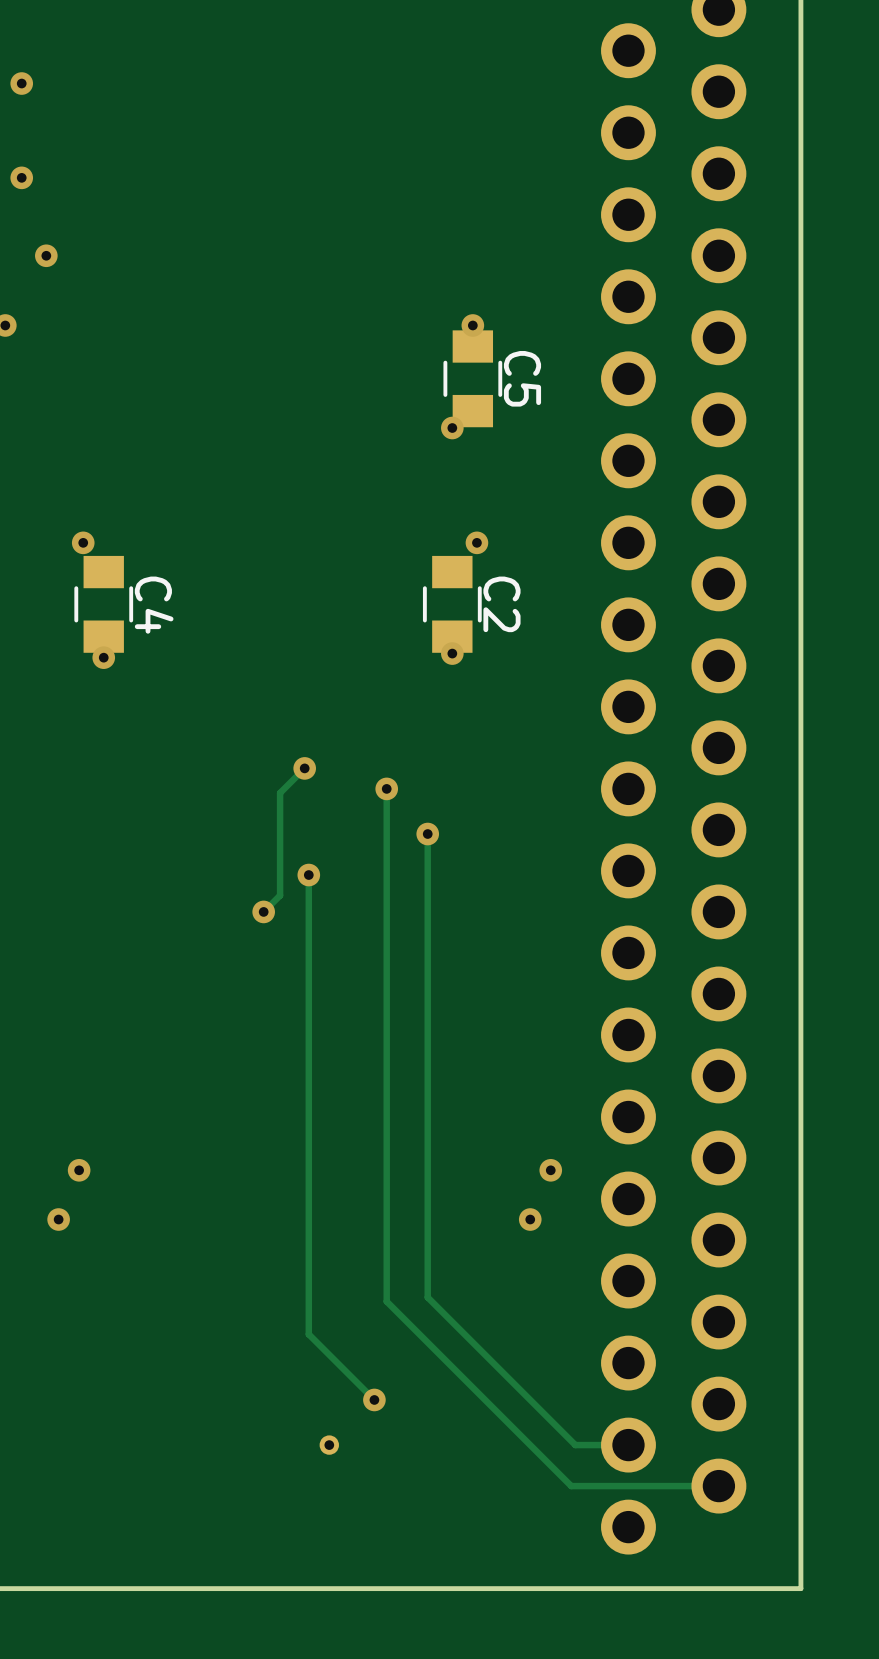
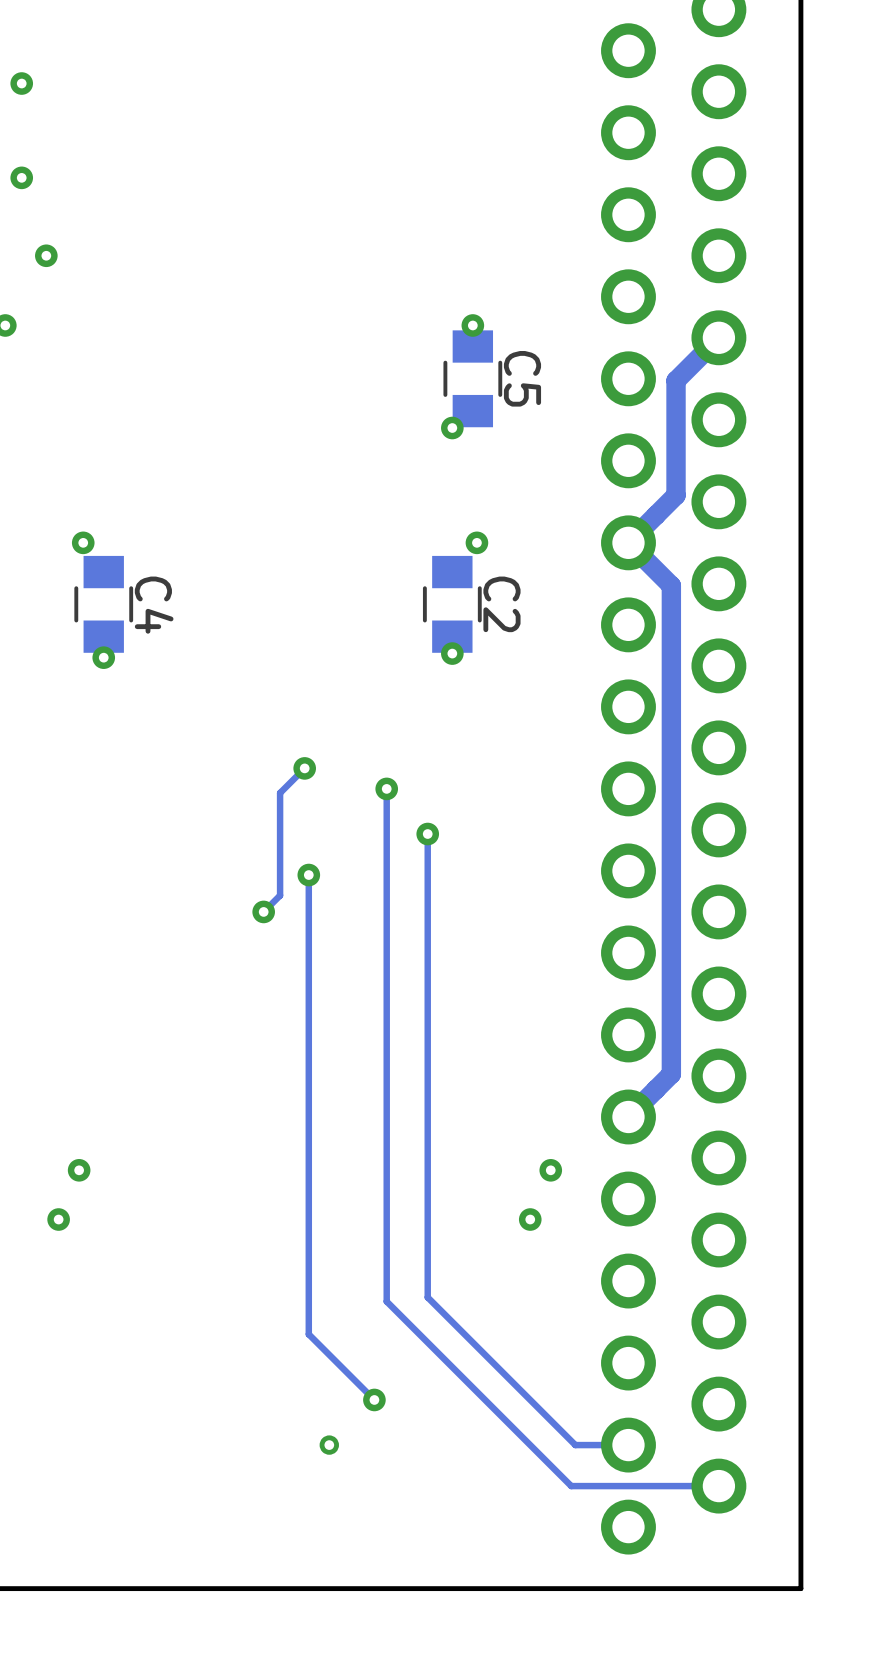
track: none -> (718, 337) (676, 380) (676, 495) (628, 542) (671, 585) (671, 1074) (628, 1116)

